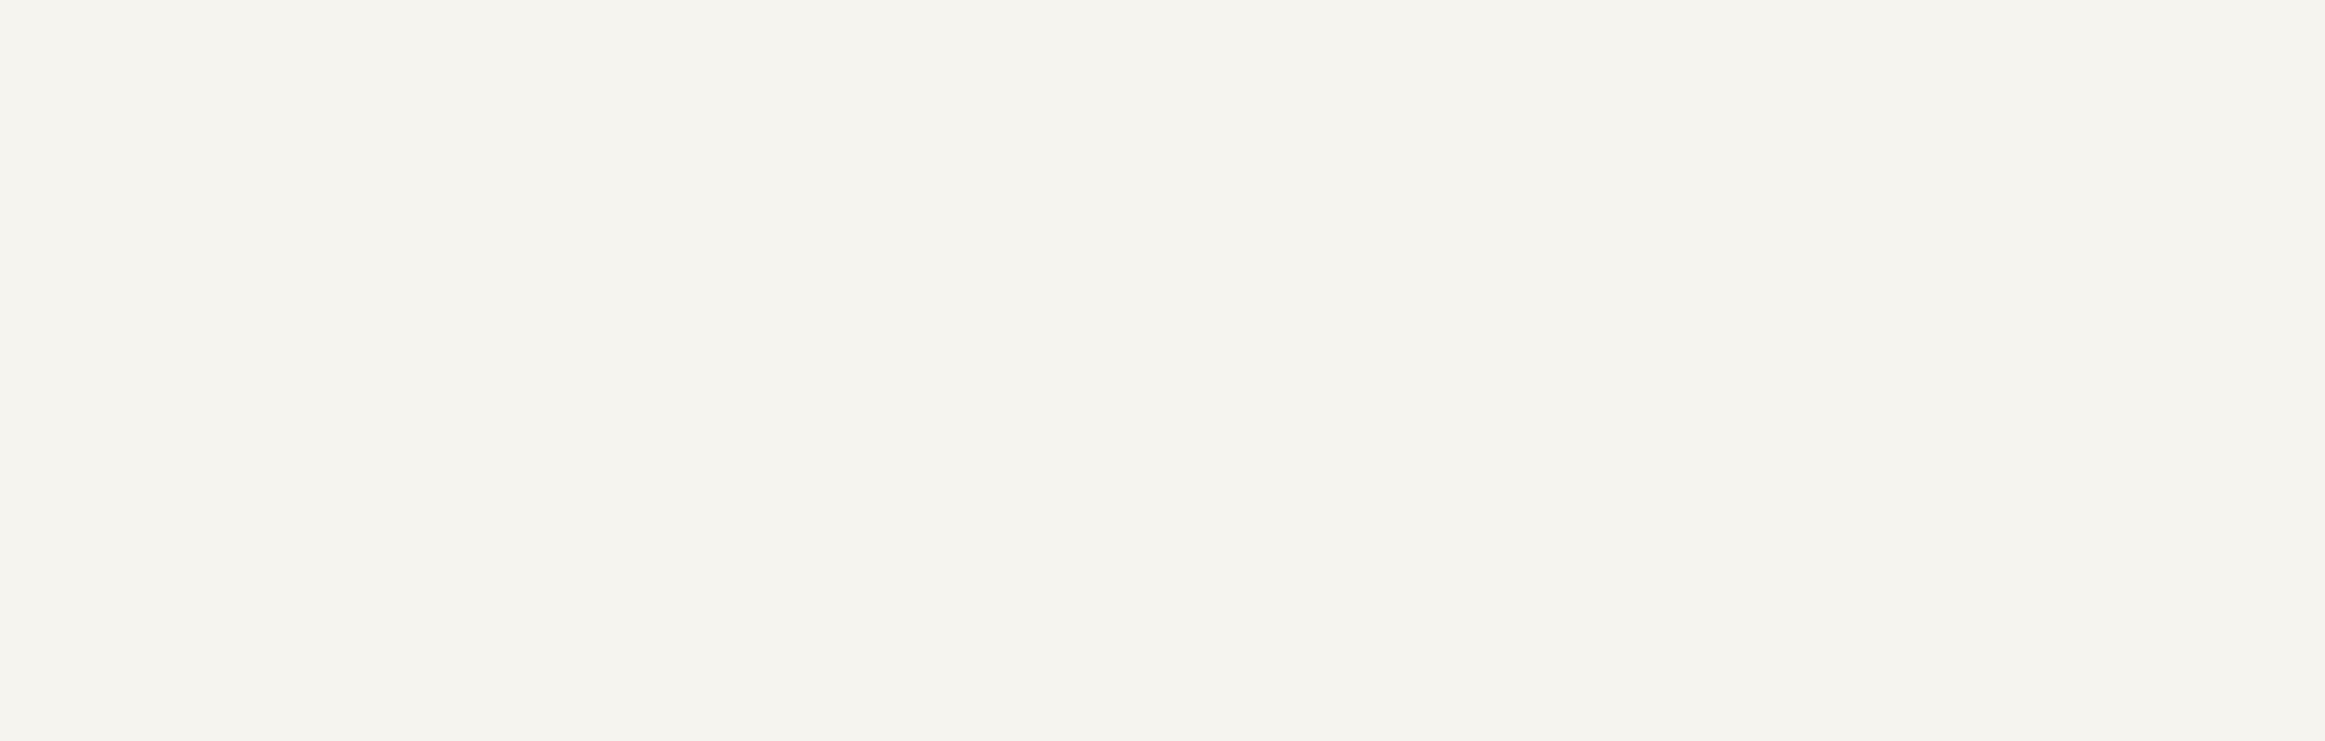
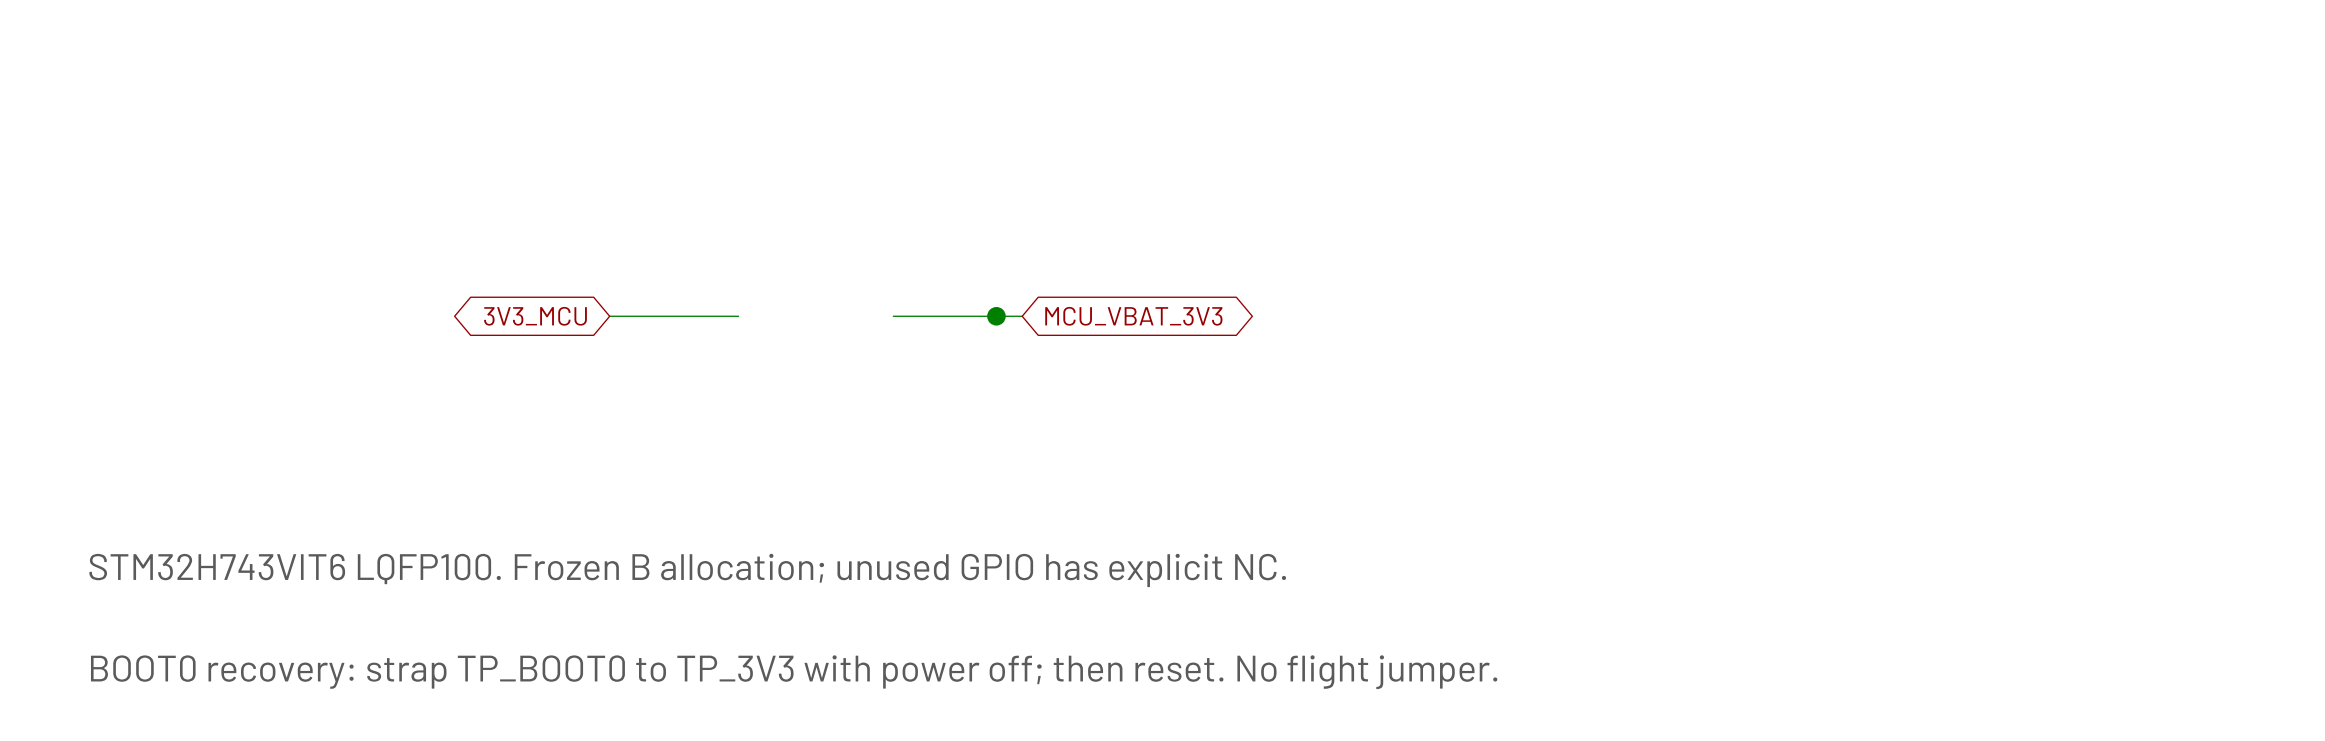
wire: none -> (609, 316) (738, 316)
wire: none -> (893, 316) (1022, 316)
junction: none -> (996, 316)
global label: none -> 3V3_MCU (535, 316)
global label: none -> MCU_VBAT_3V3 (1133, 316)
text: none -> STM32H743VIT6 LQFP100. Frozen B allocation; unused GPIO has explicit NC. (687, 570)
text: none -> BOOT0 recovery: strap TP_BOOT0 to TP_3V3 with power off; then reset. No flight jumper. (794, 672)

